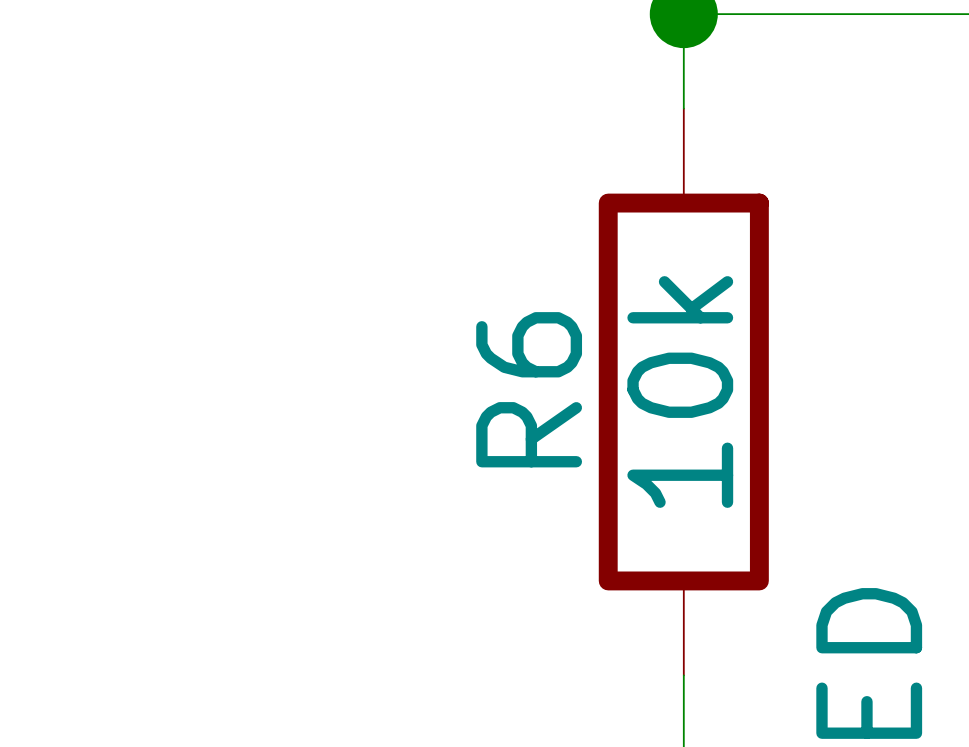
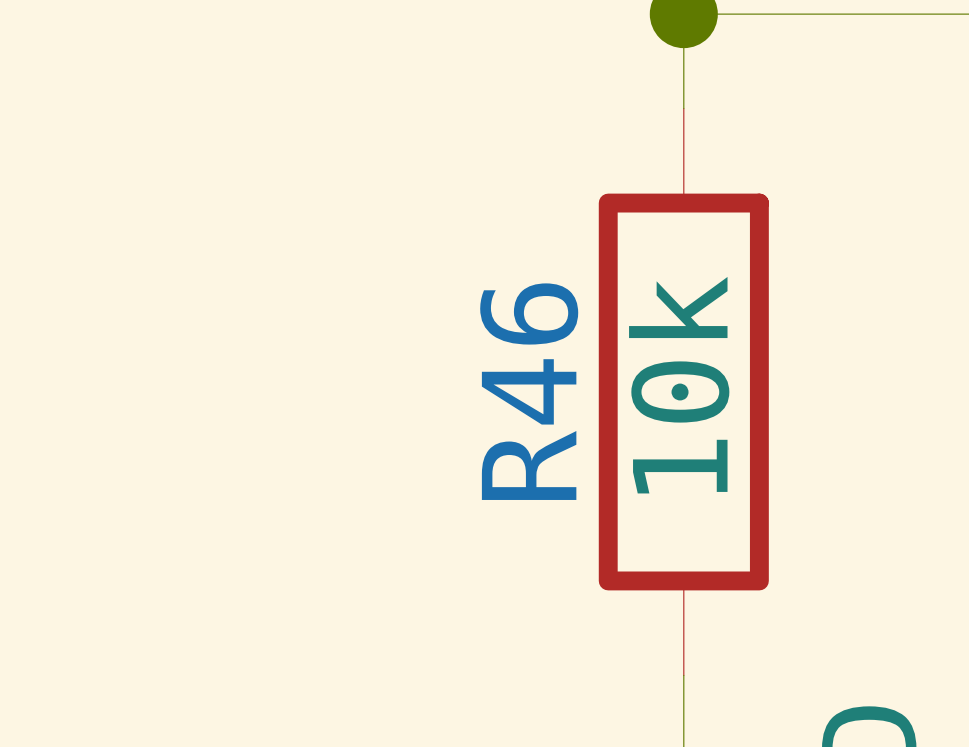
R6 name: R6 (529, 389) -> R46 (529, 391)

